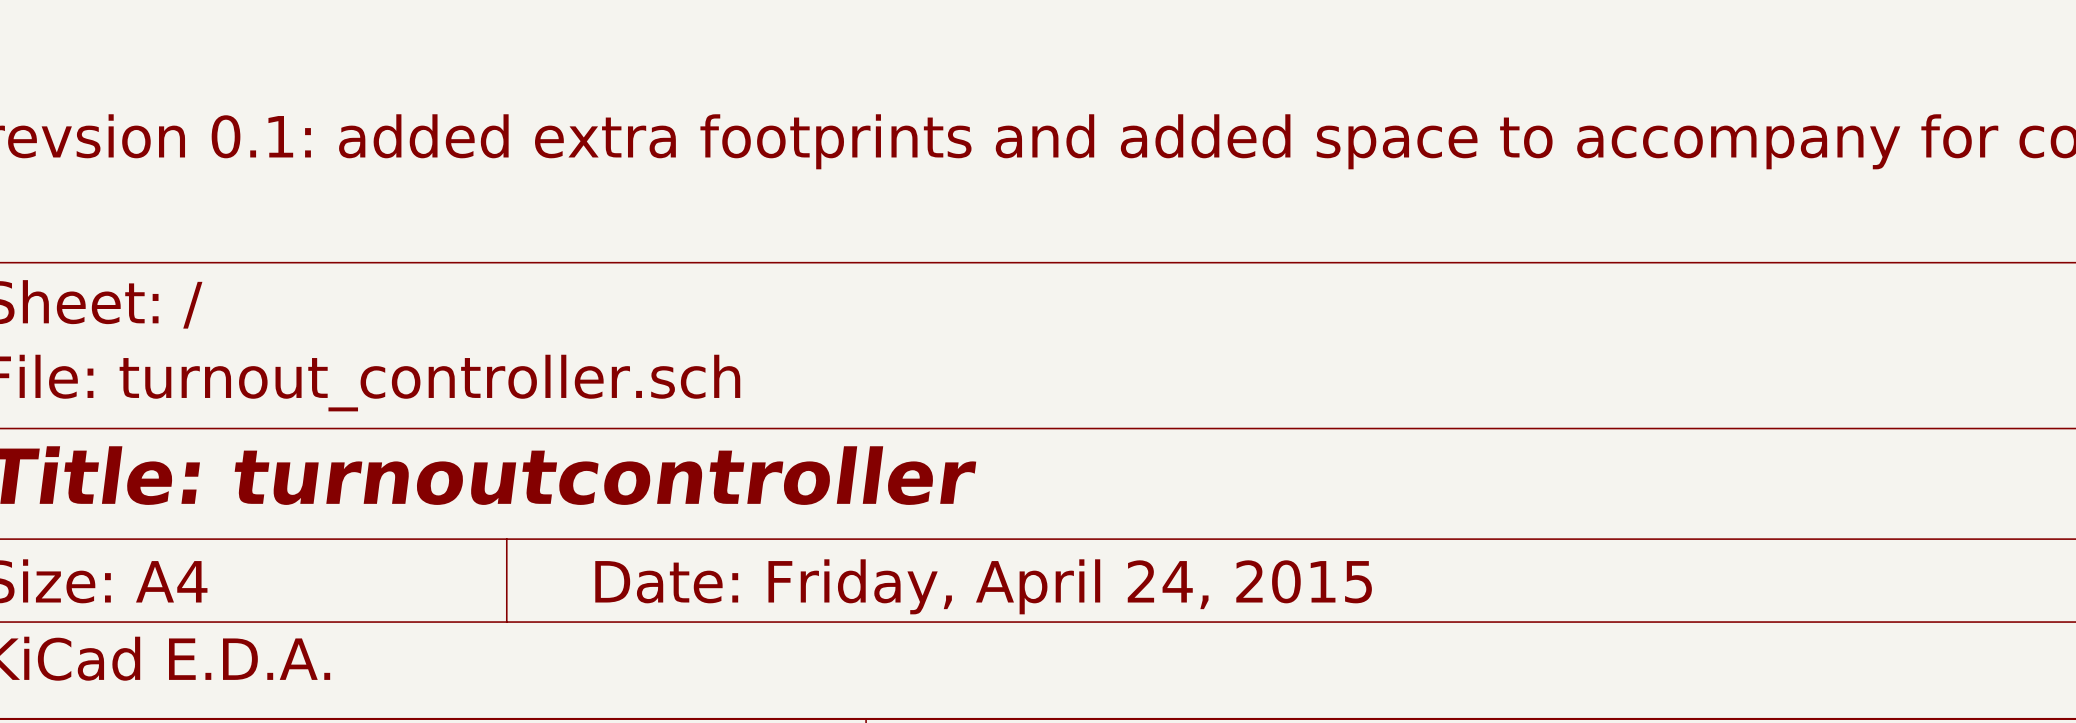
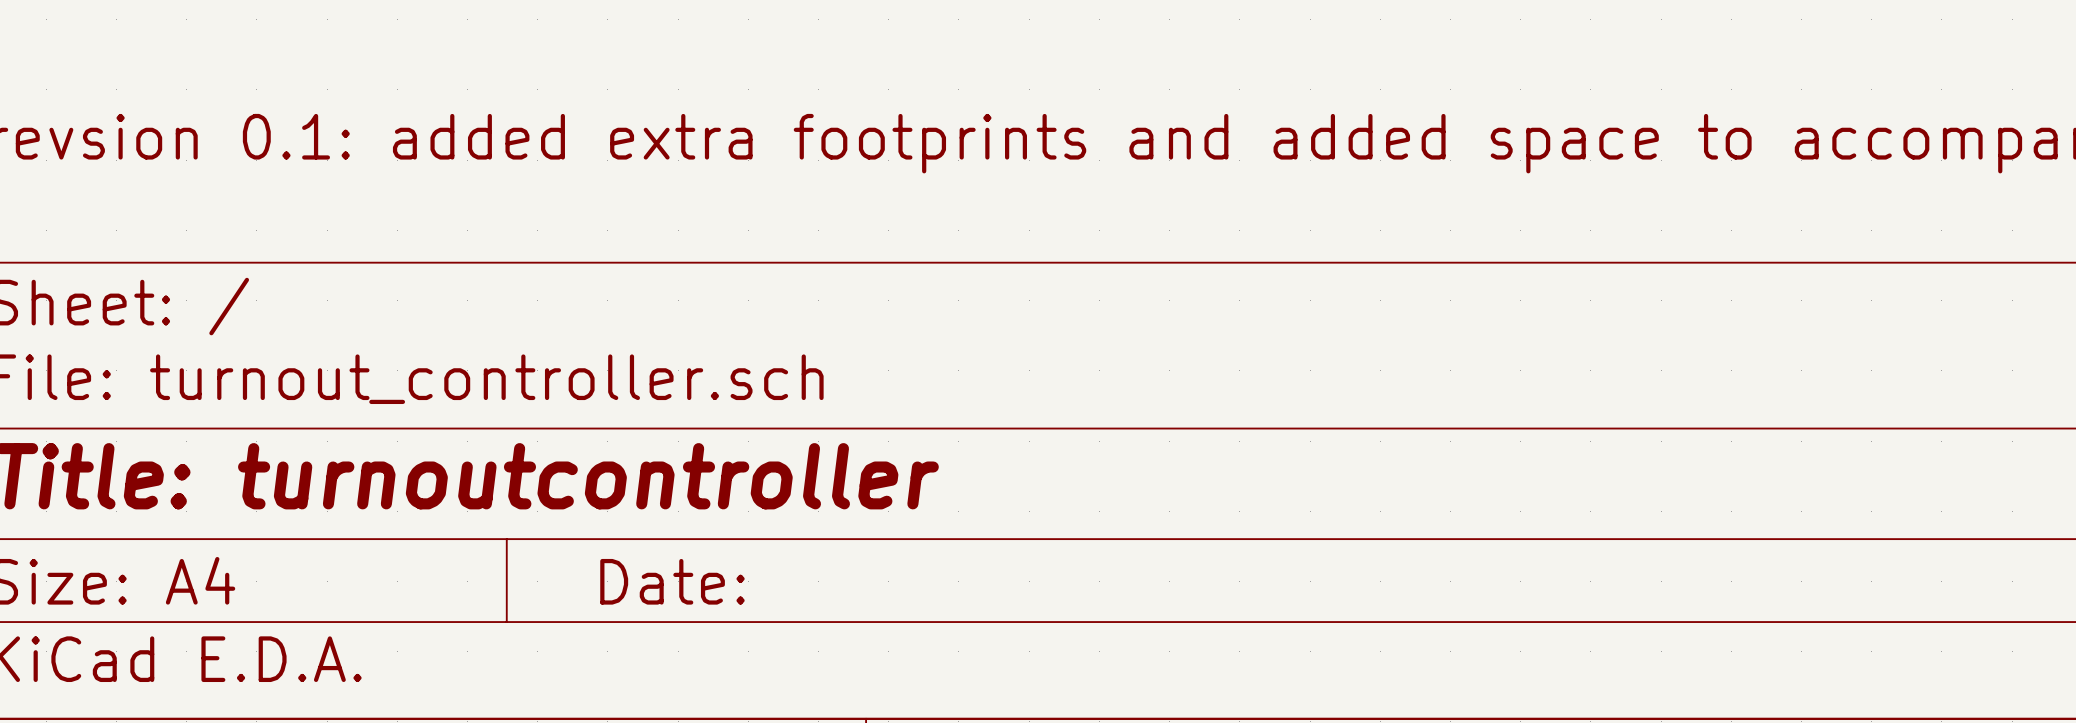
title block: Date: Friday, April 24, 2015 (983, 586) -> Date: (672, 581)

